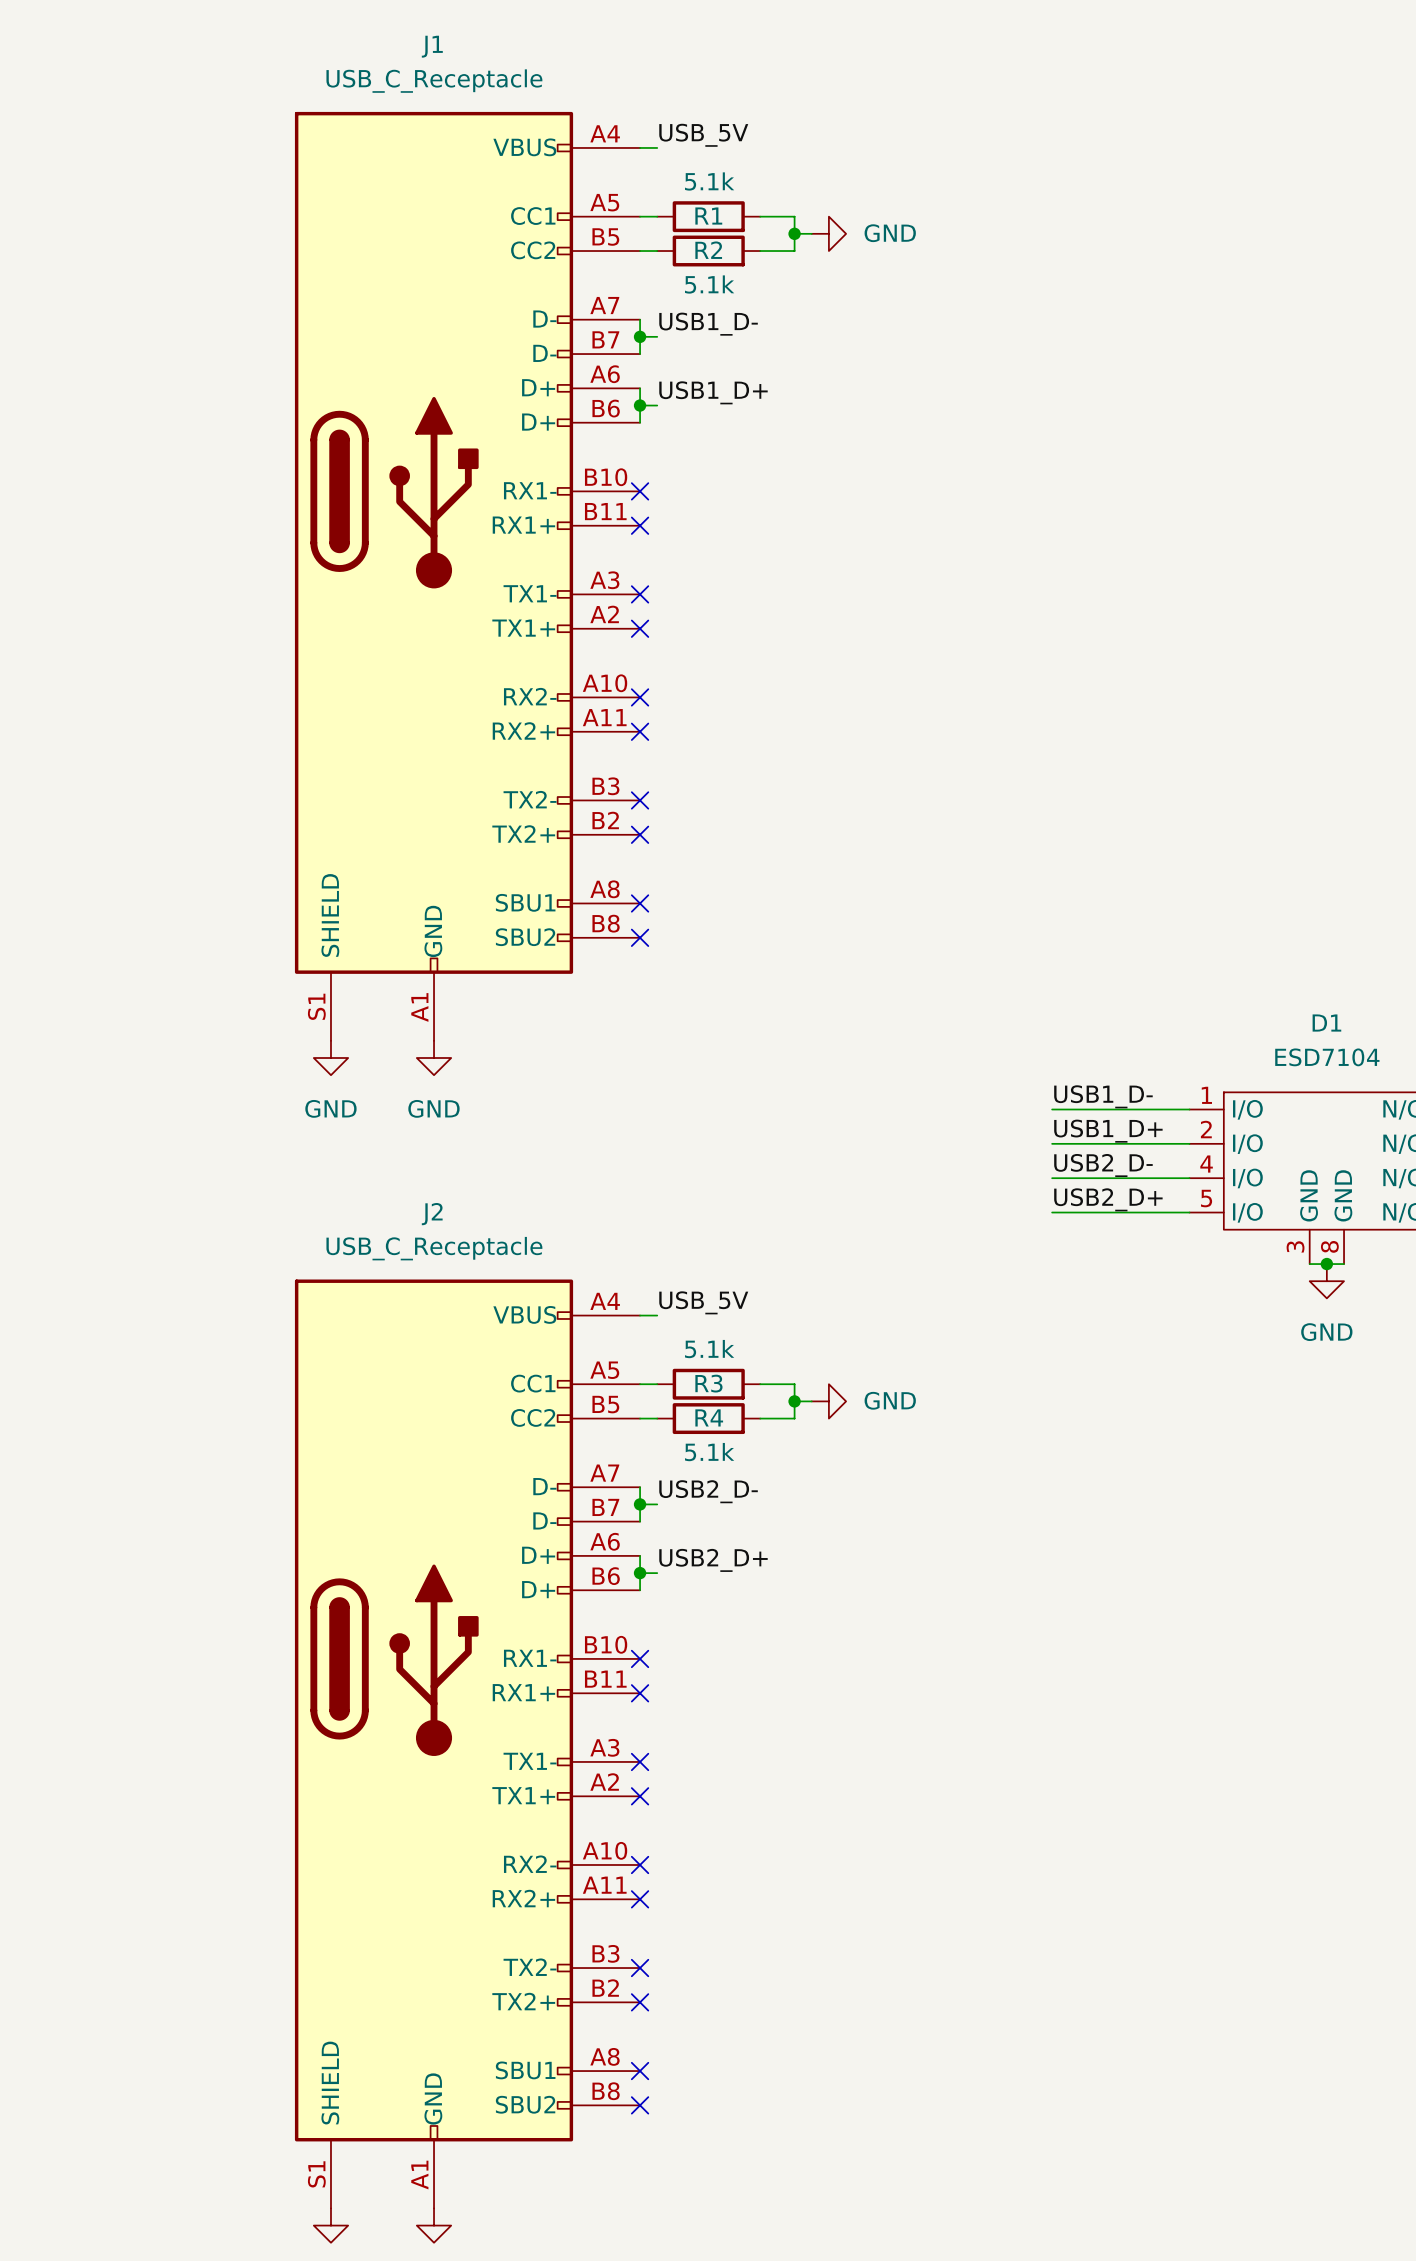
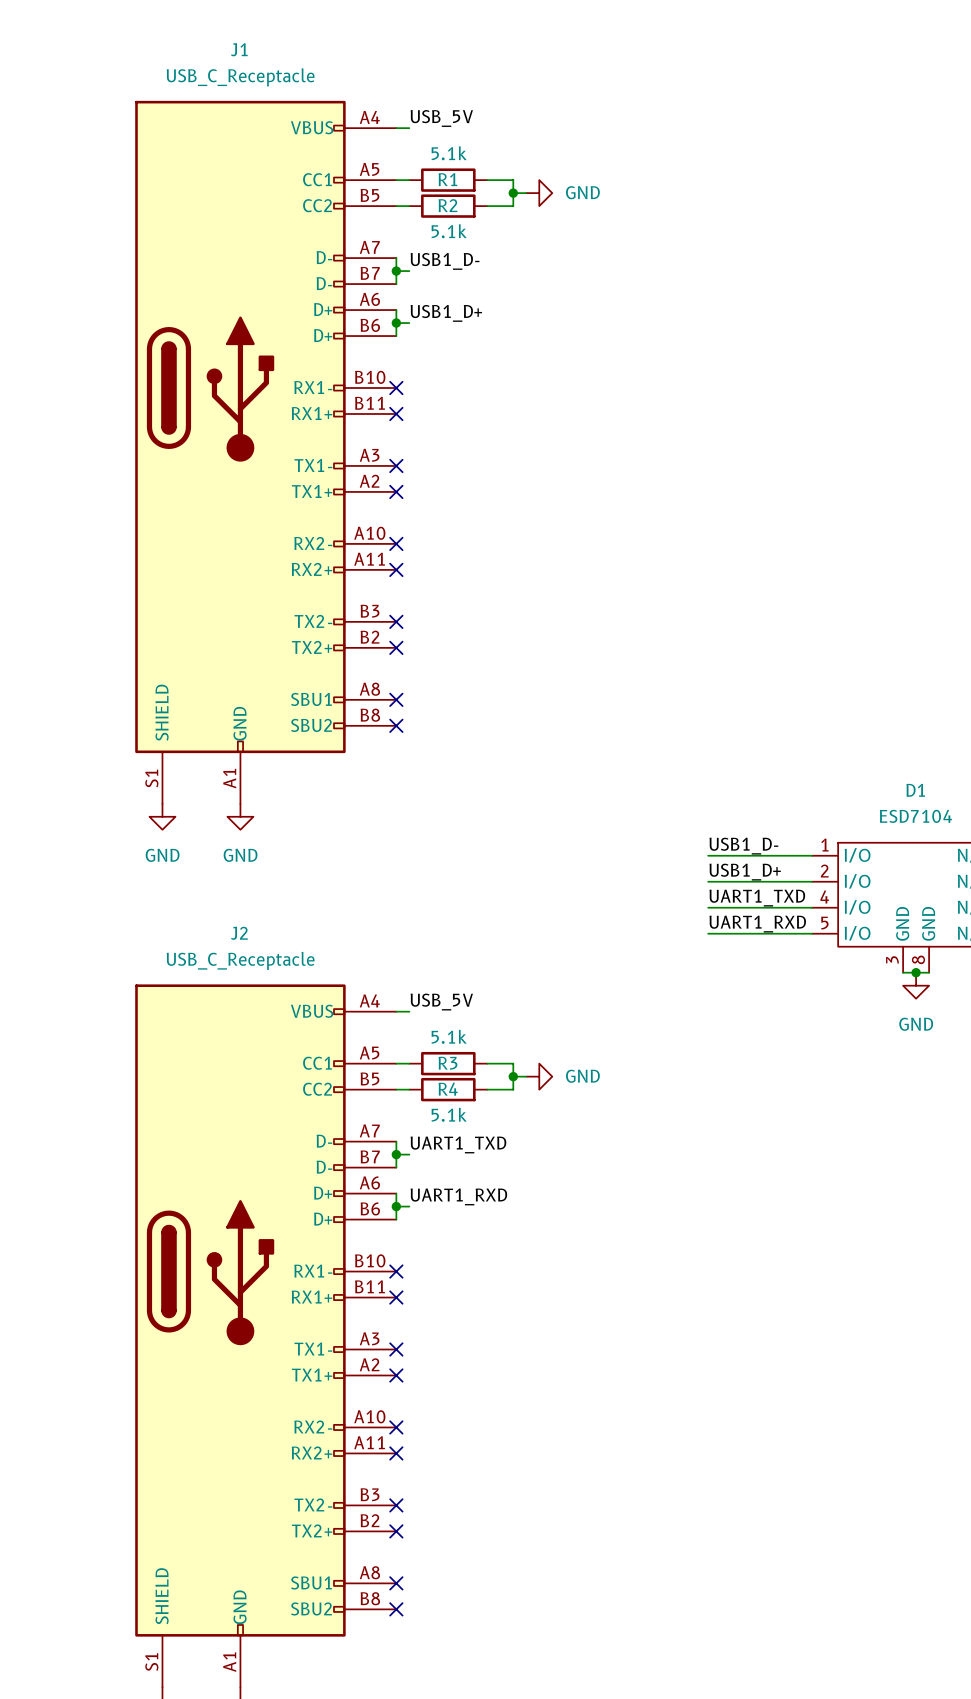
label: USB2_D- (1103, 1165) -> UART1_TXD (757, 898)
label: USB2_D+ (1108, 1199) -> UART1_RXD (757, 924)
label: USB2_D- (708, 1491) -> UART1_TXD (458, 1144)
label: USB2_D+ (713, 1560) -> UART1_RXD (458, 1196)

